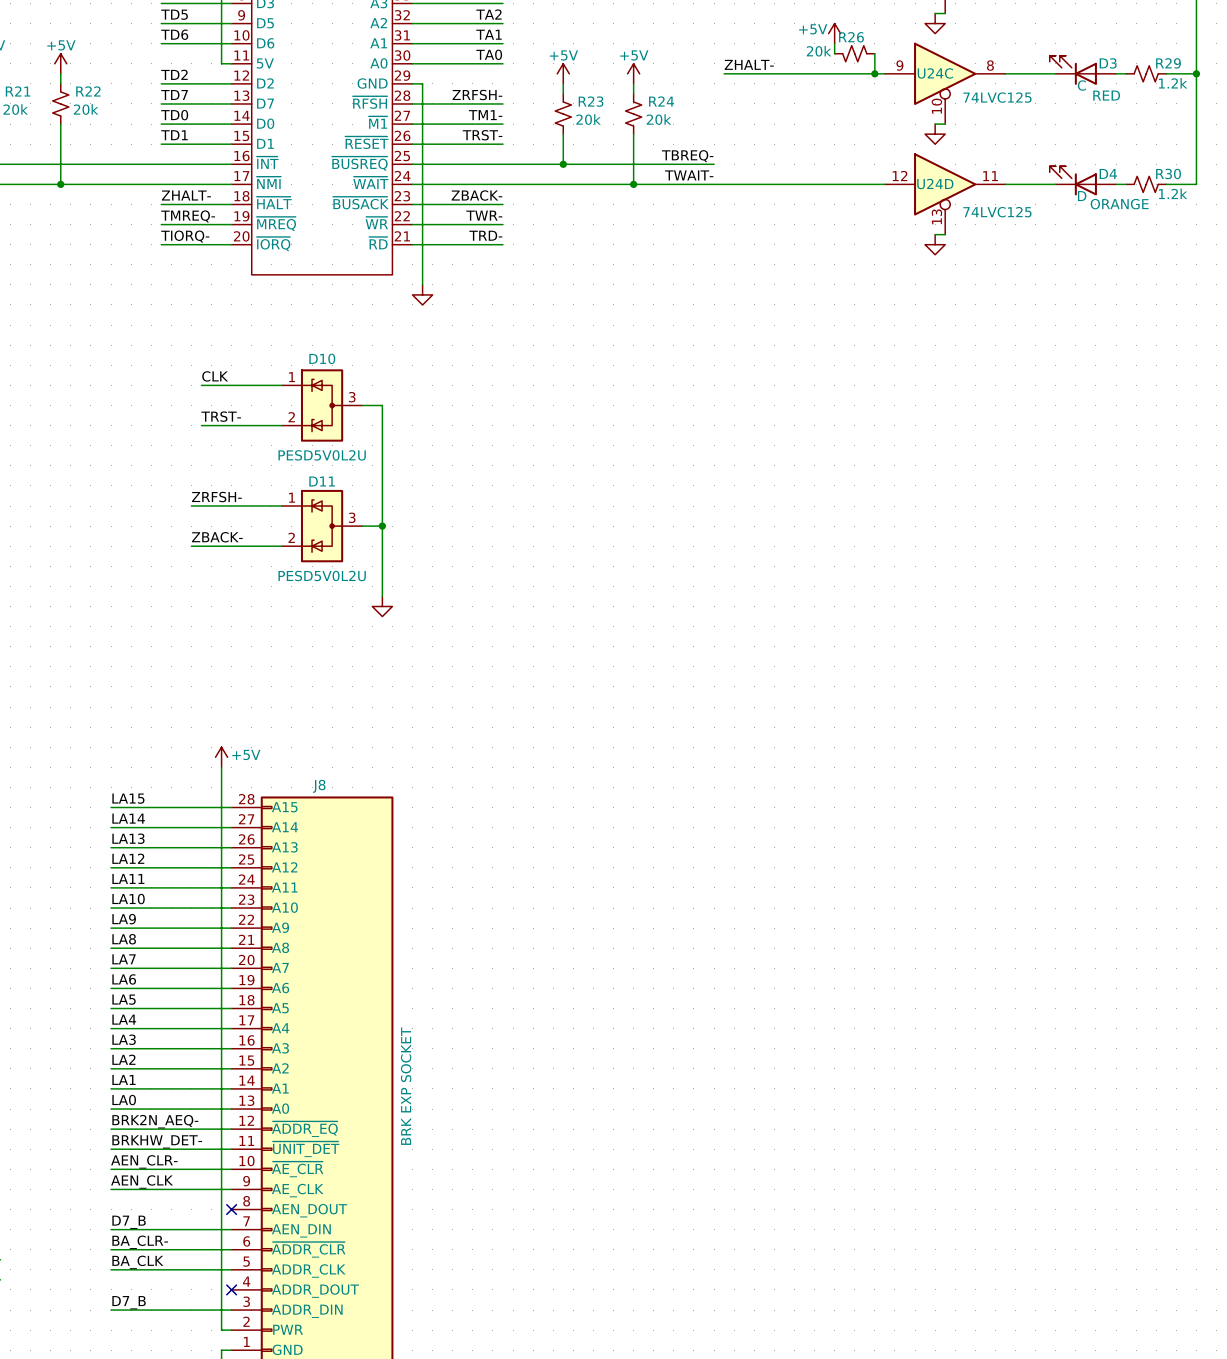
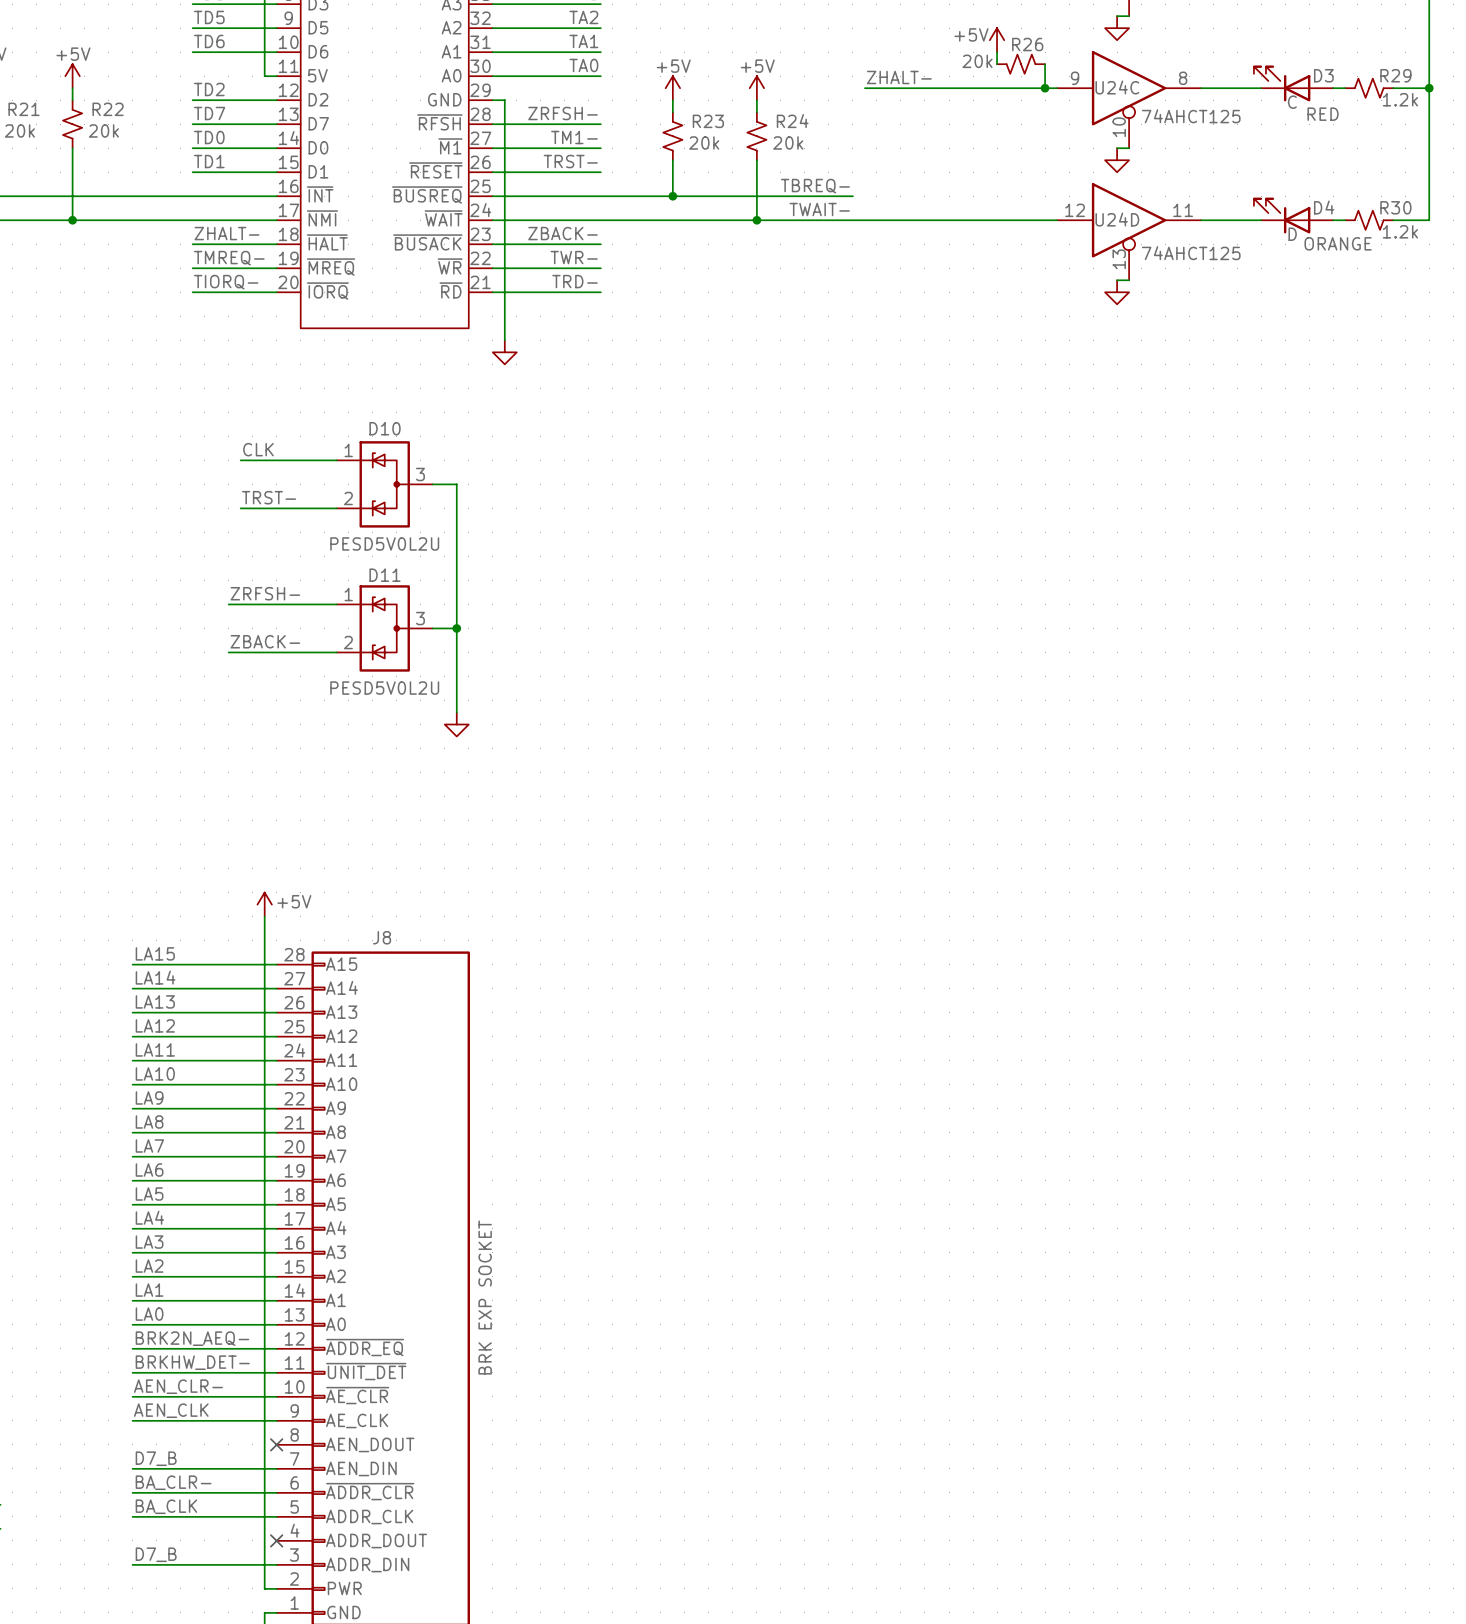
R26 name position: R26 (851, 37) -> R26 (1027, 44)
U24C value: 74LVC125 (997, 97) -> 74AHCT125 (1191, 116)
U24D value: 74LVC125 (997, 212) -> 74AHCT125 (1191, 253)

